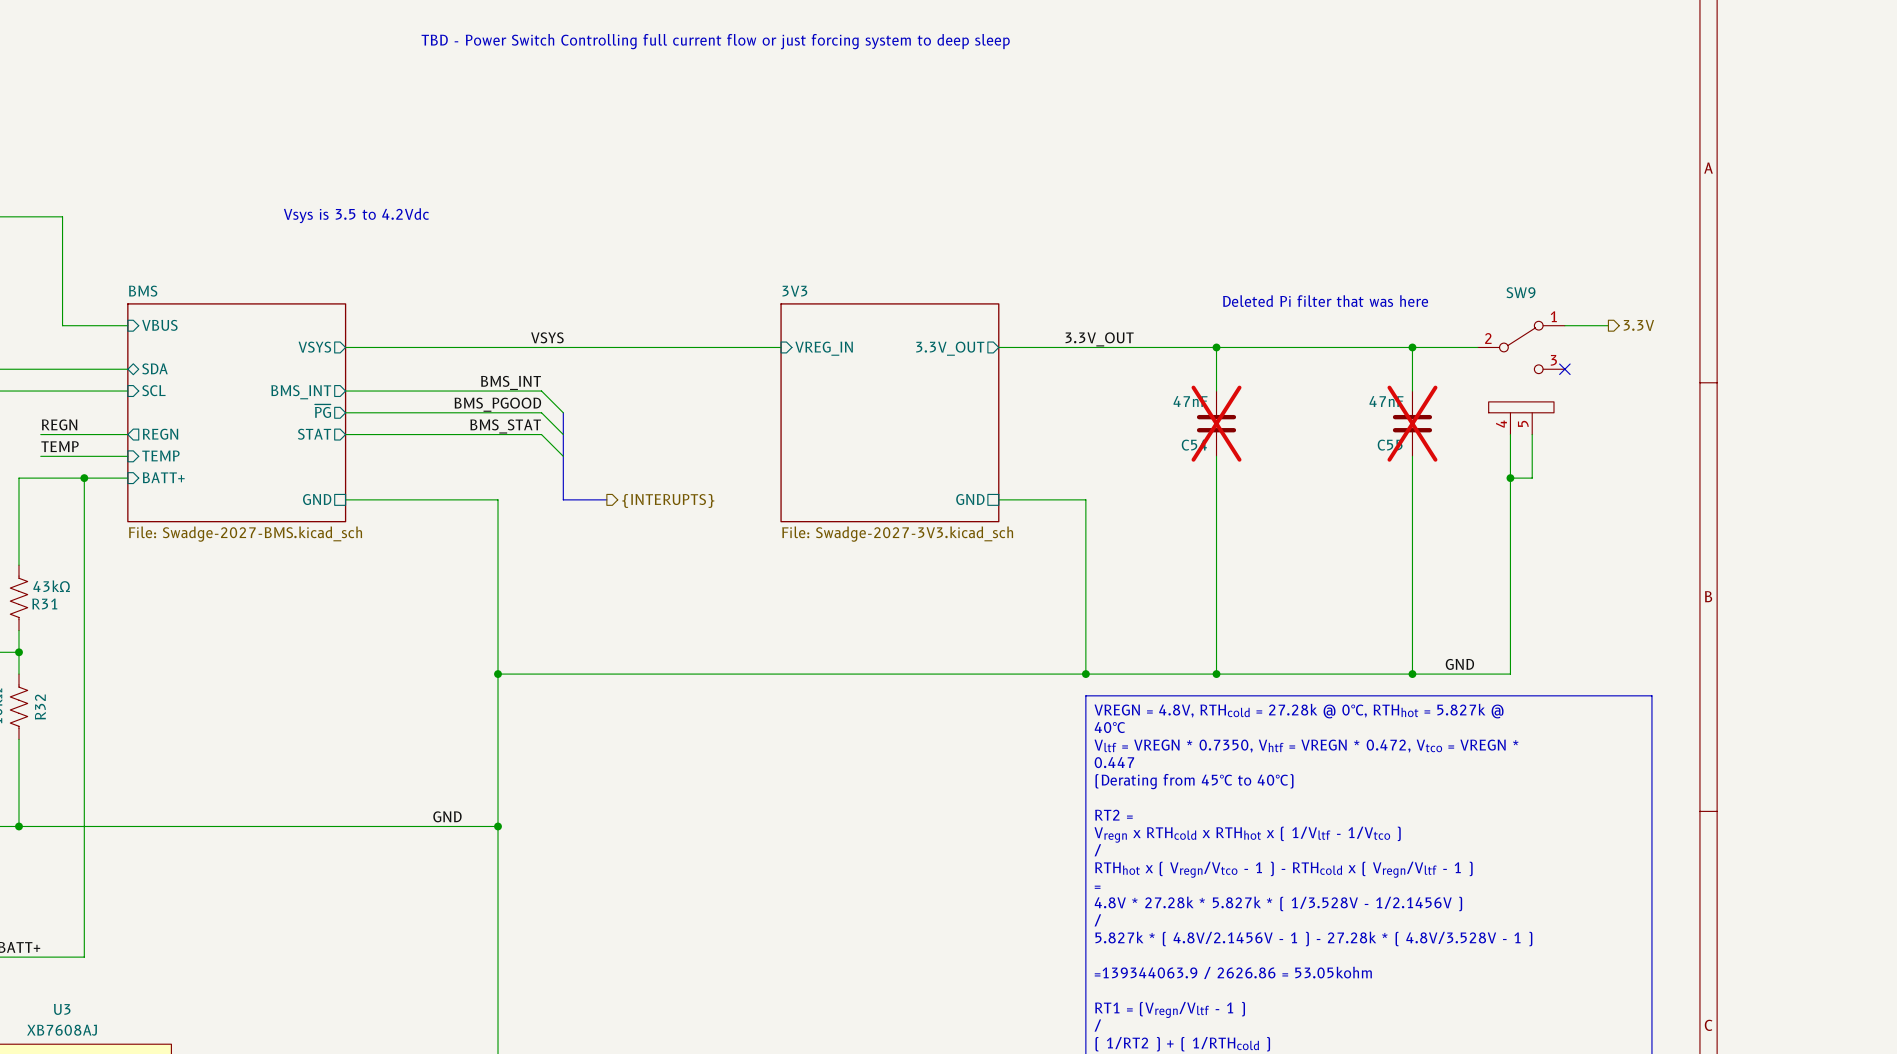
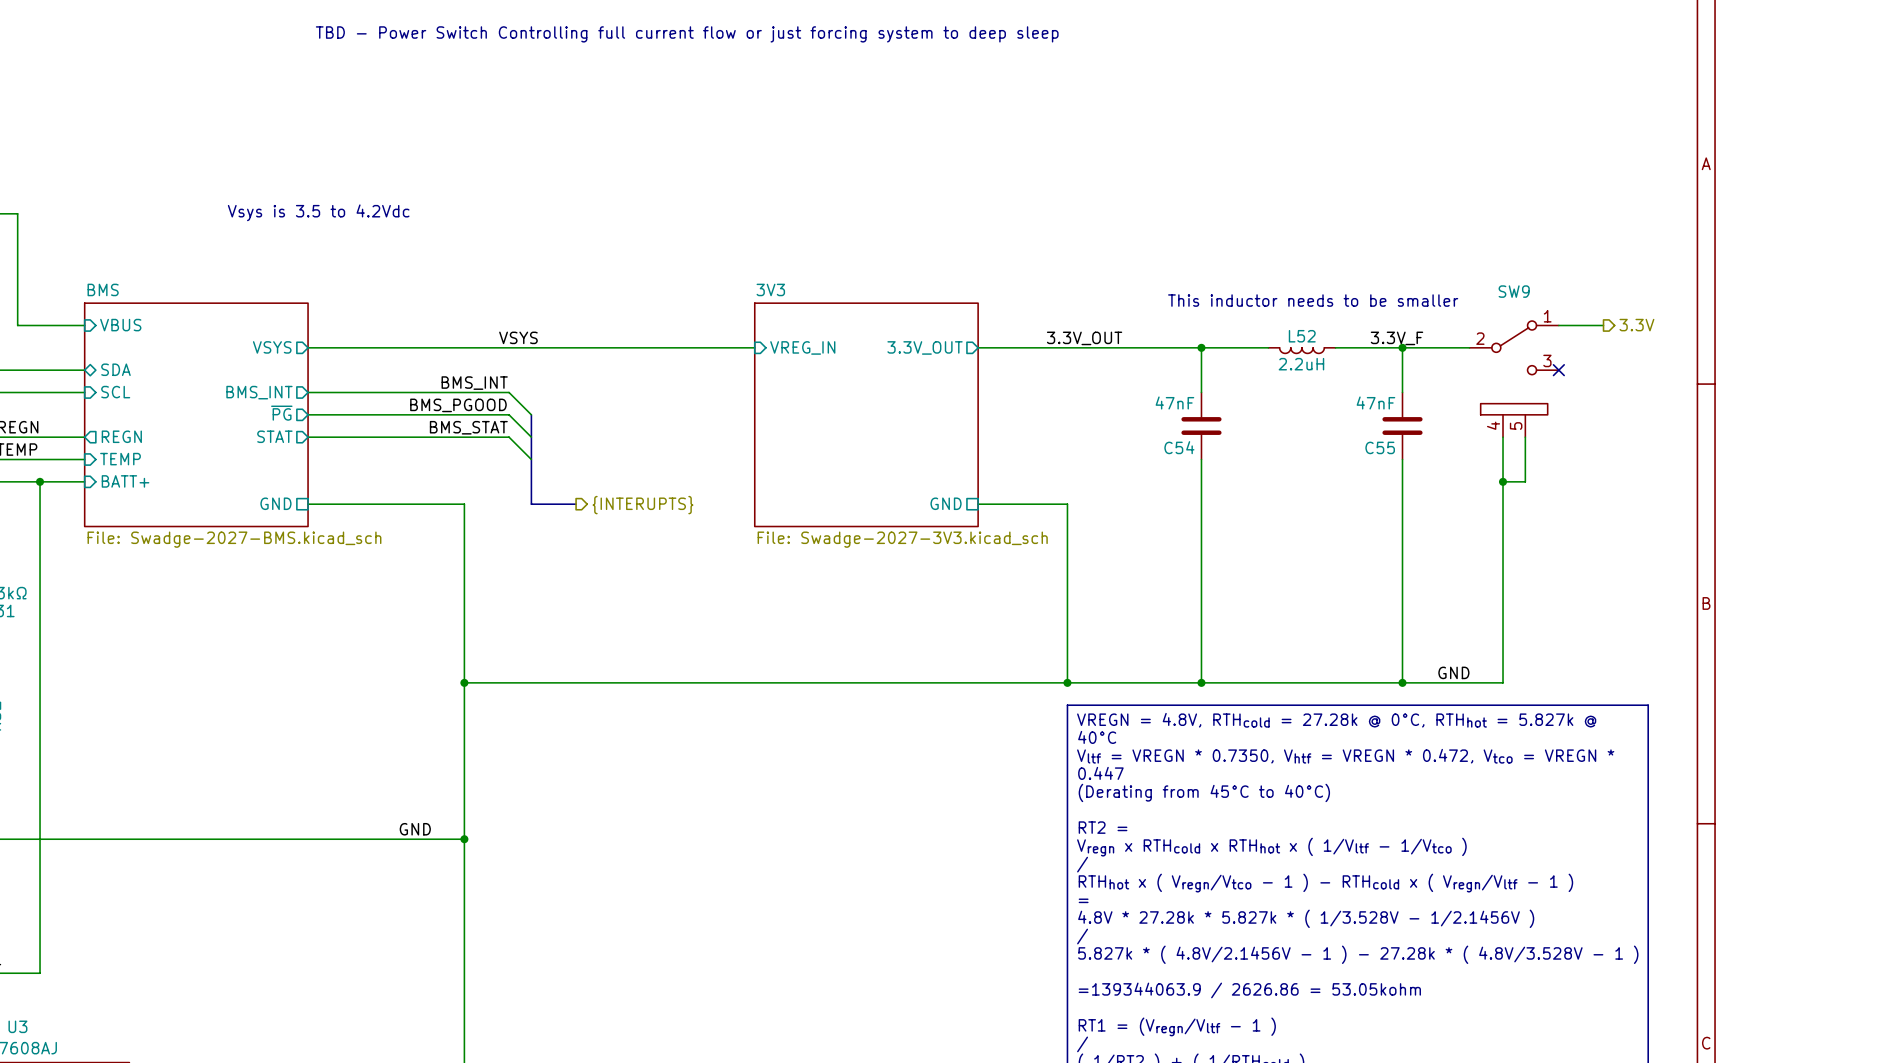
text: Deleted Pi filter that was here (1325, 301) -> This inductor needs to be smaller (1313, 300)
label: none -> 3.3V_F (1396, 338)
wire: (1281, 347) (1347, 347) -> none
L52: none -> 2.2uH (1301, 350)
C54 do-not-place cross: (1216, 423) -> none
C55 do-not-place cross: (1412, 423) -> none

